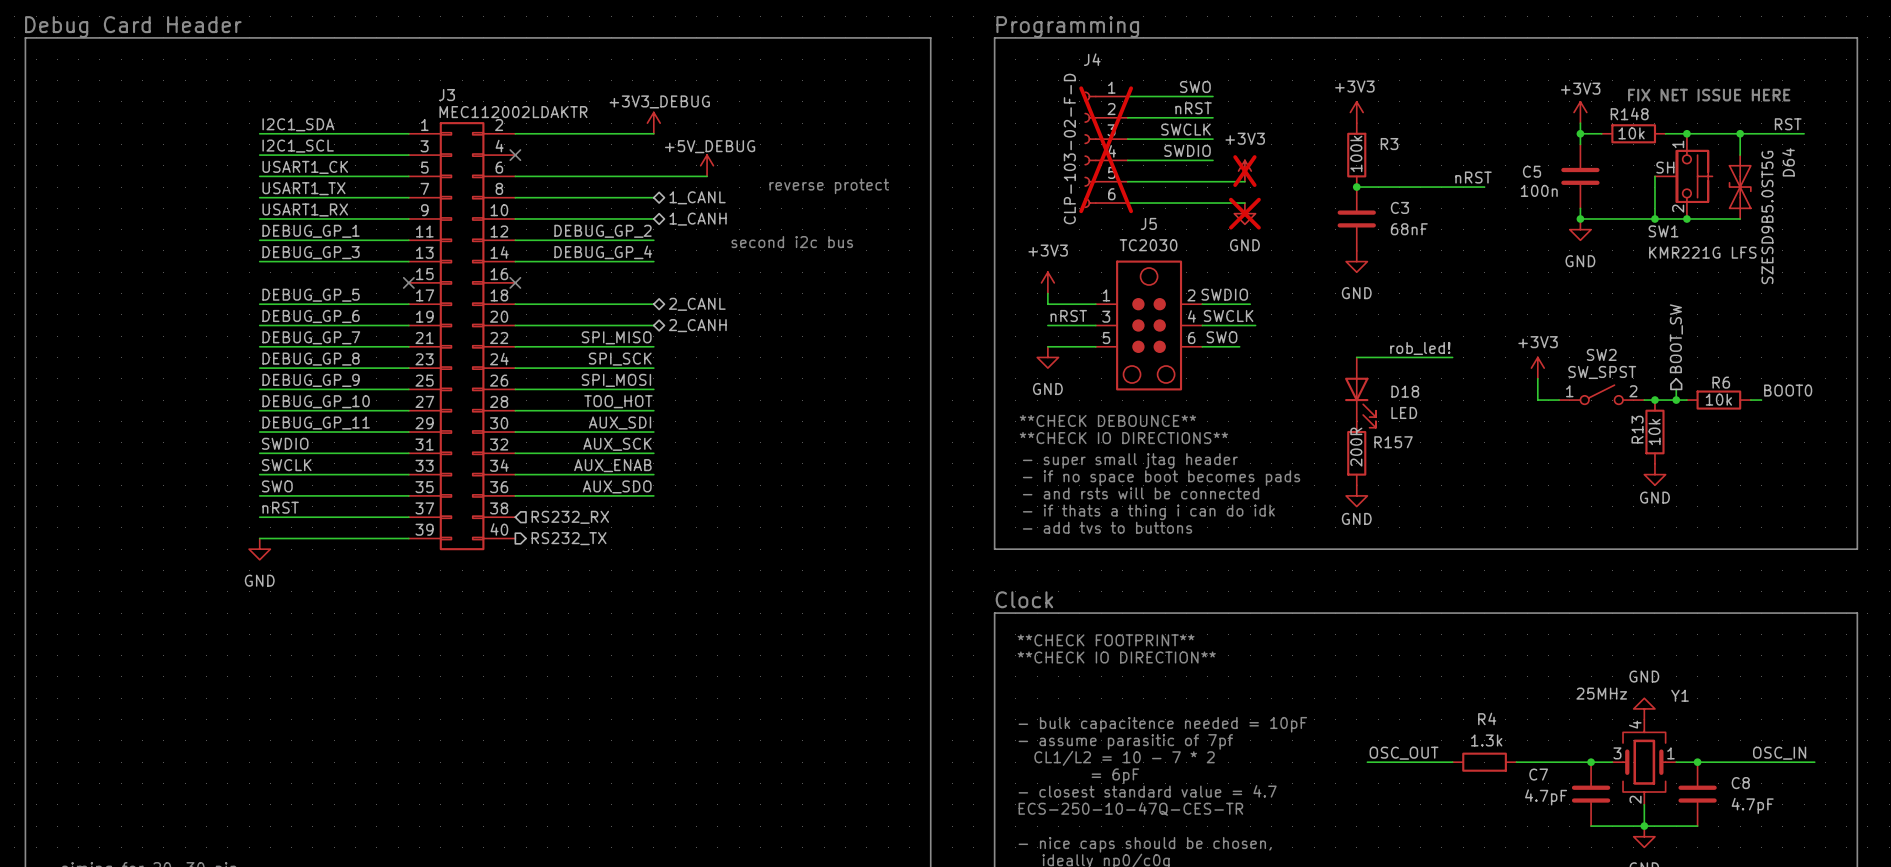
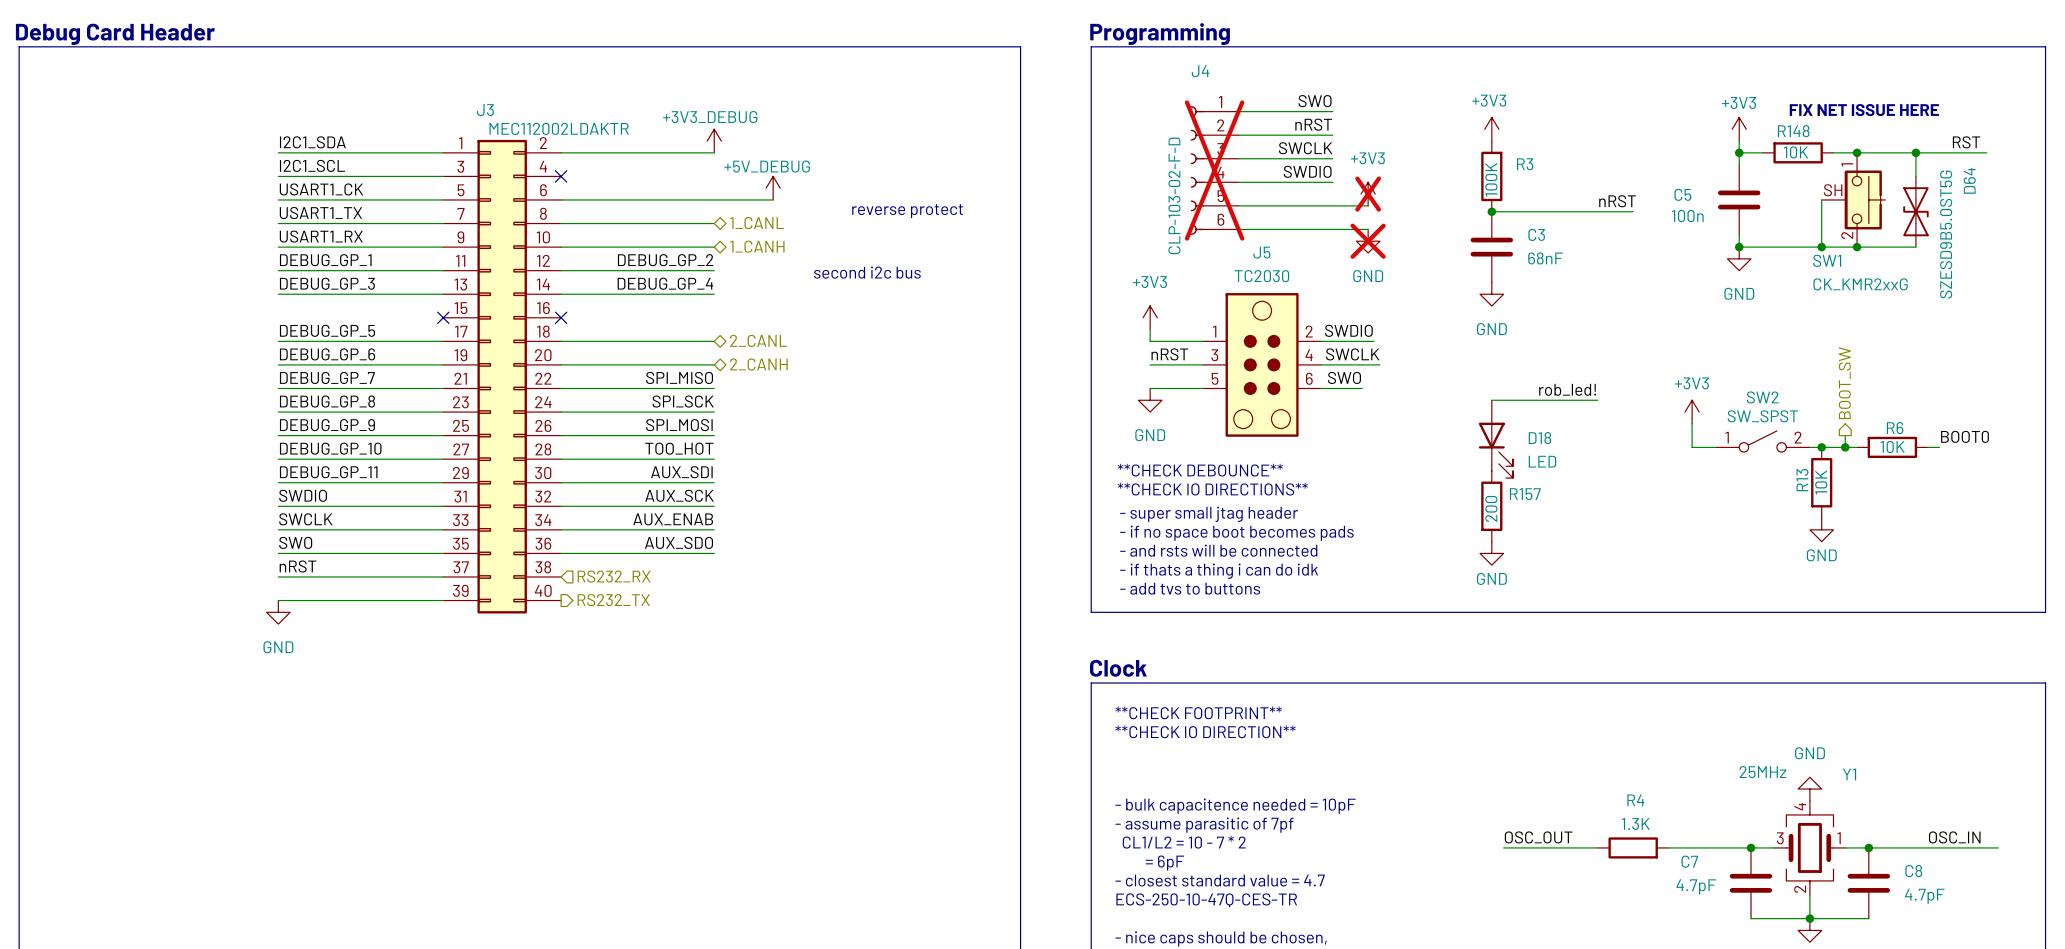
R148 value: 10k (1631, 133) -> 10K (1796, 152)
R3 value: 100k (1356, 153) -> 100K (1491, 179)
SW1 value: KMR221G LFS (1702, 252) -> CK_KMR2xxG (1860, 284)
R6 value: 10k (1718, 399) -> 10K (1892, 446)
R13 value: 10k (1654, 432) -> 10K (1821, 482)
R157 value: 200R (1356, 447) -> 200 (1491, 508)
R4 value: 1.3k (1486, 740) -> 1.3K (1635, 824)

